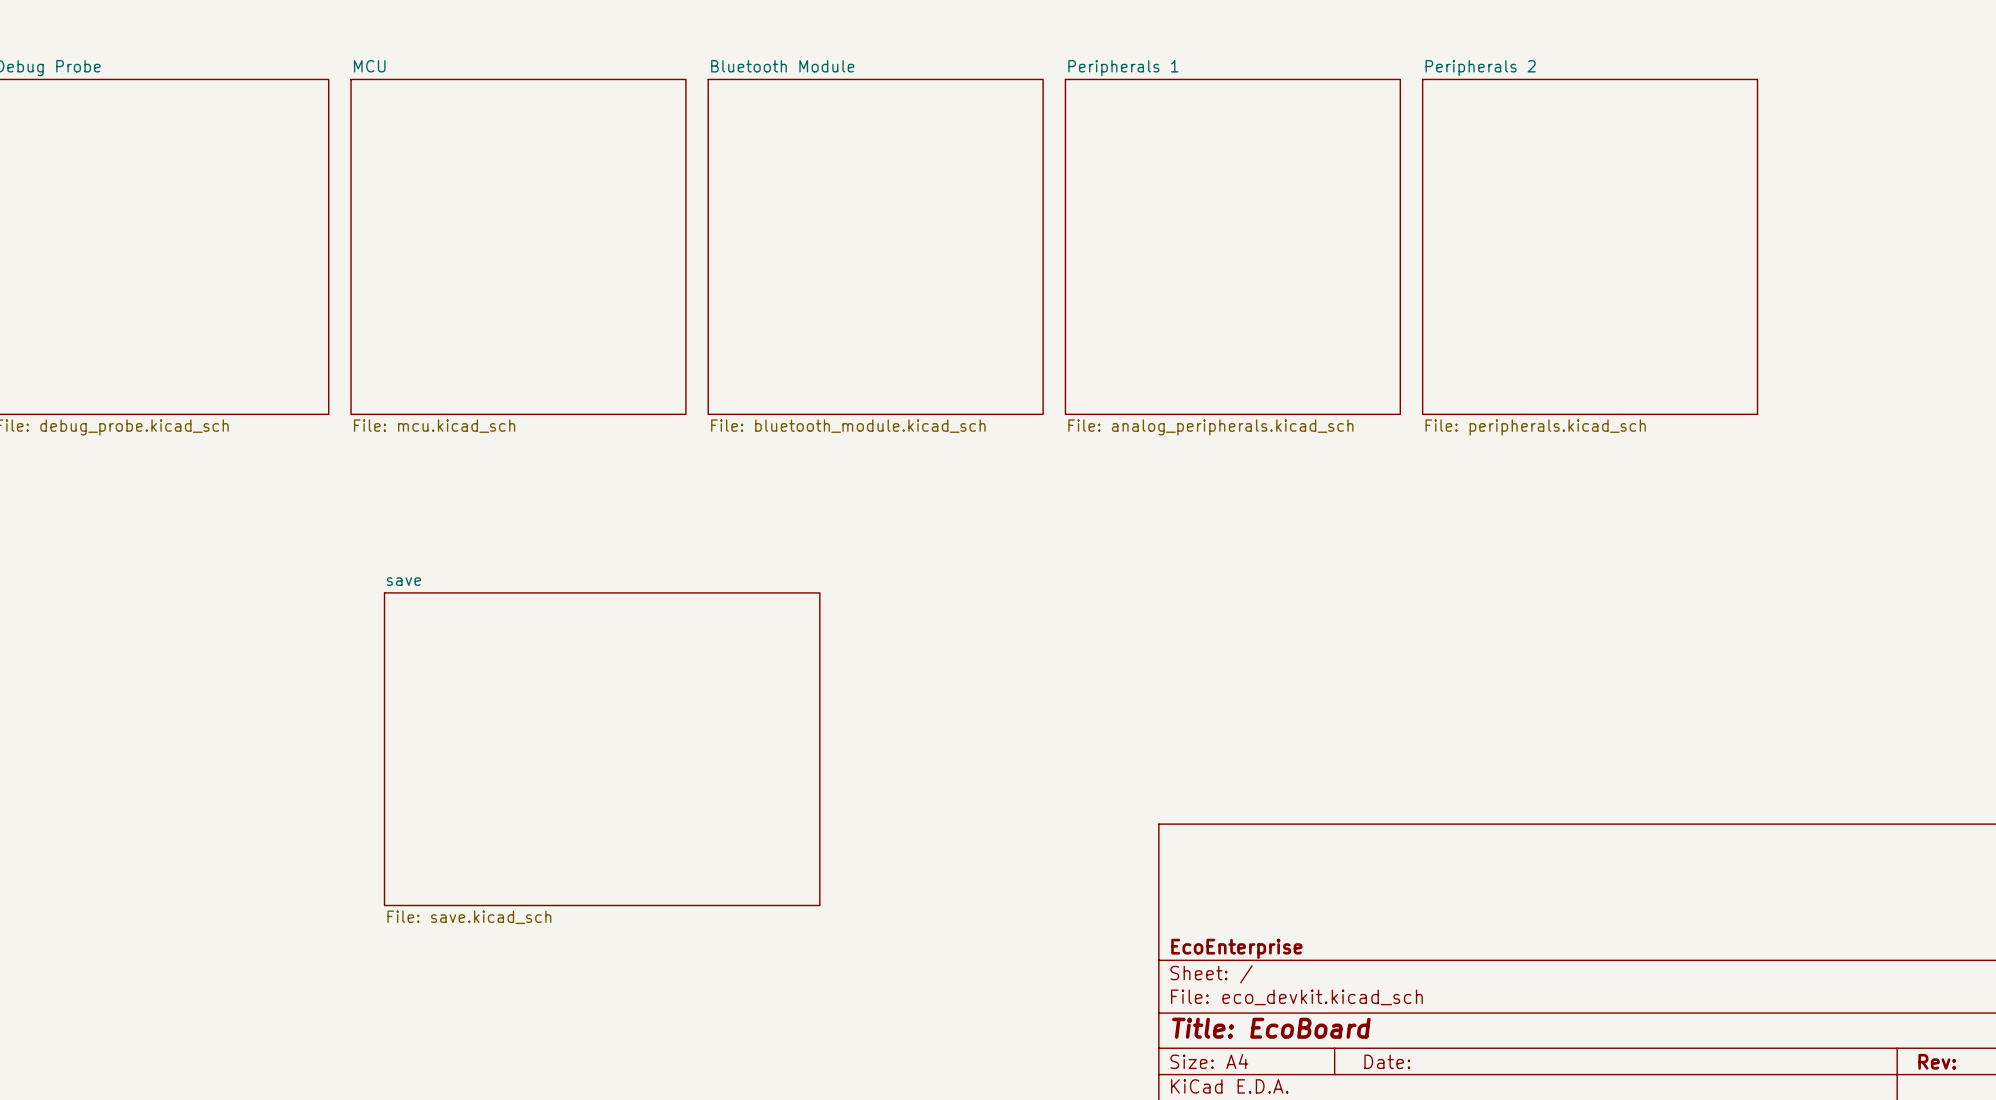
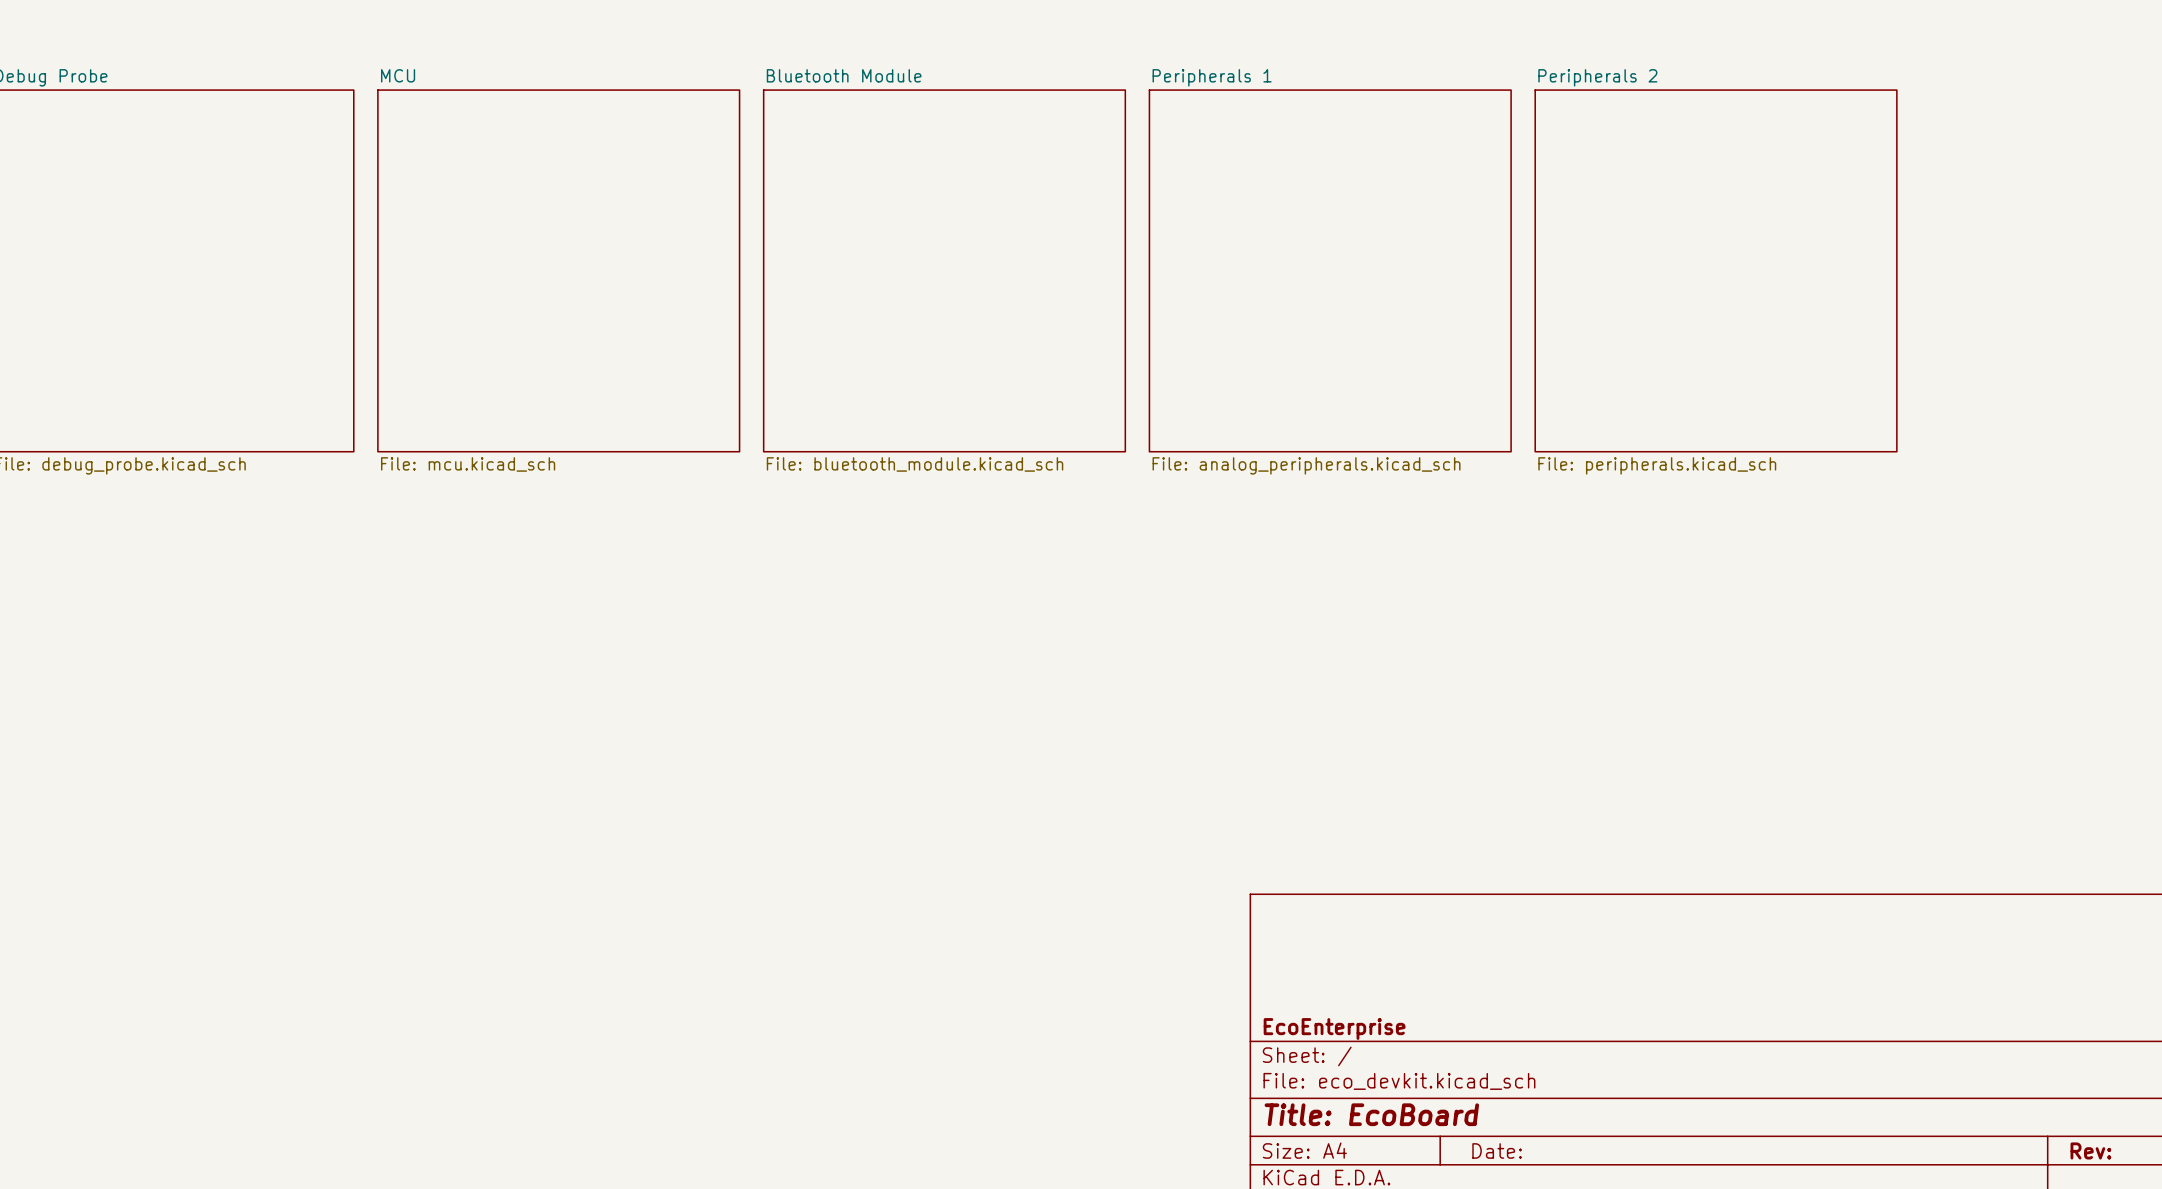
sheet save: File: save.kicad_sch (602, 749) -> none

